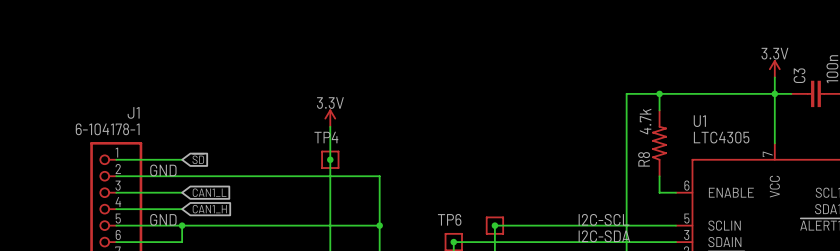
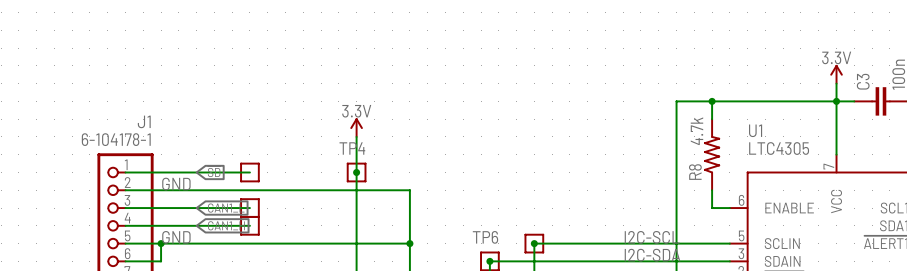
wire: none -> (196, 172) (249, 172)
part: none -> (249, 172)
wire: none -> (196, 208) (249, 208)
part: none -> (249, 208)
wire: none -> (196, 225) (249, 225)
part: none -> (249, 225)
wire: (182, 225) (182, 242) (149, 242) -> (161, 243) (161, 261)
junction position: (182, 225) -> (161, 243)

